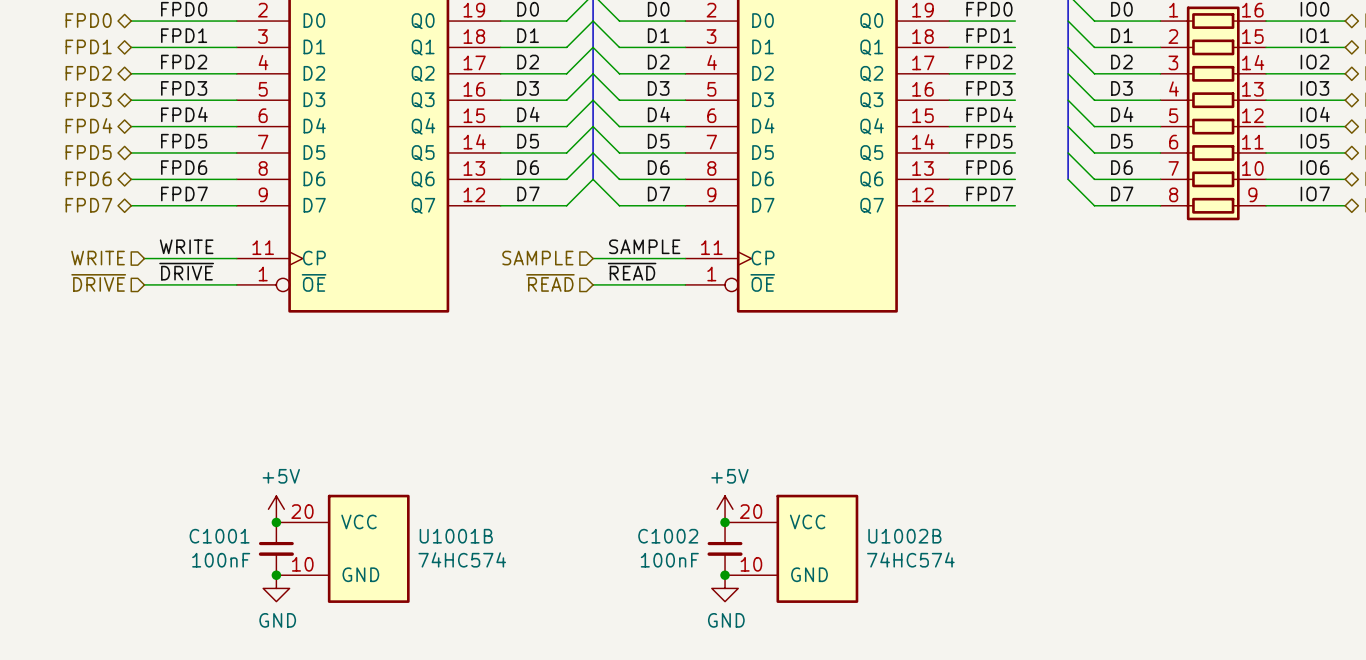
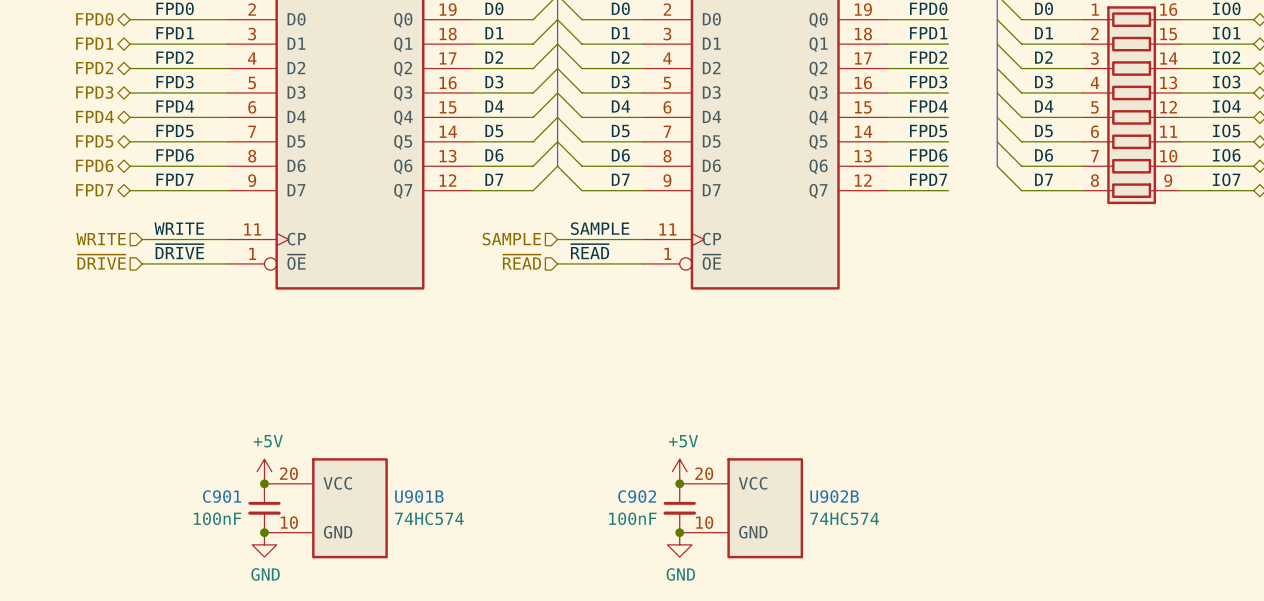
C1001 name: C1001 (219, 536) -> C901 (222, 496)
U1001B name: U1001B (456, 536) -> U901B (419, 496)
C1002 name: C1002 (668, 536) -> C902 (637, 496)
U1002B name: U1002B (904, 536) -> U902B (834, 496)

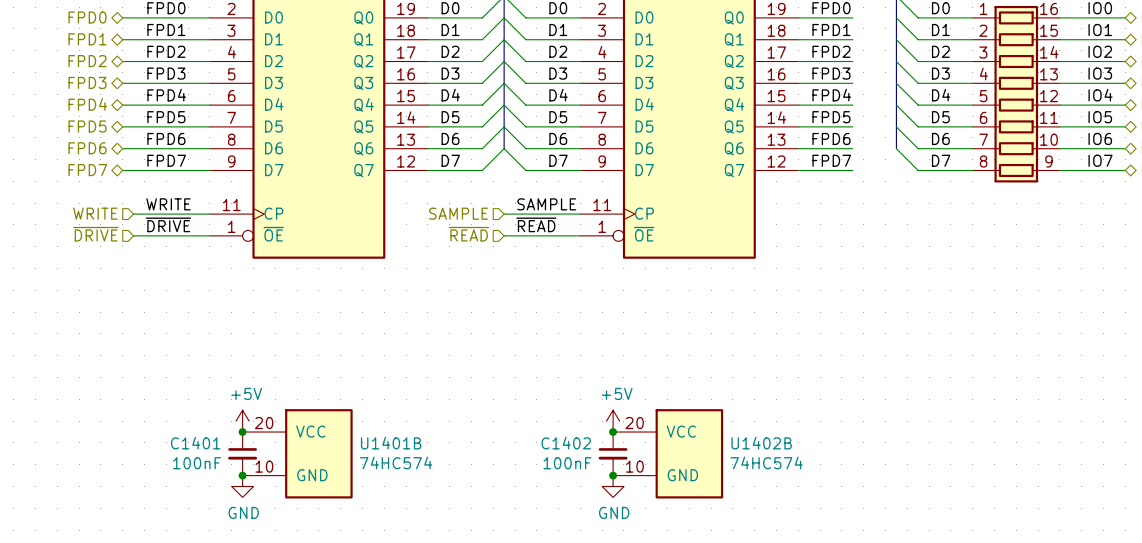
C901 name: C901 (222, 496) -> C1401 (195, 443)
U901B name: U901B (419, 496) -> U1401B (391, 443)
C902 name: C902 (637, 496) -> C1402 (566, 443)
U902B name: U902B (834, 496) -> U1402B (761, 443)

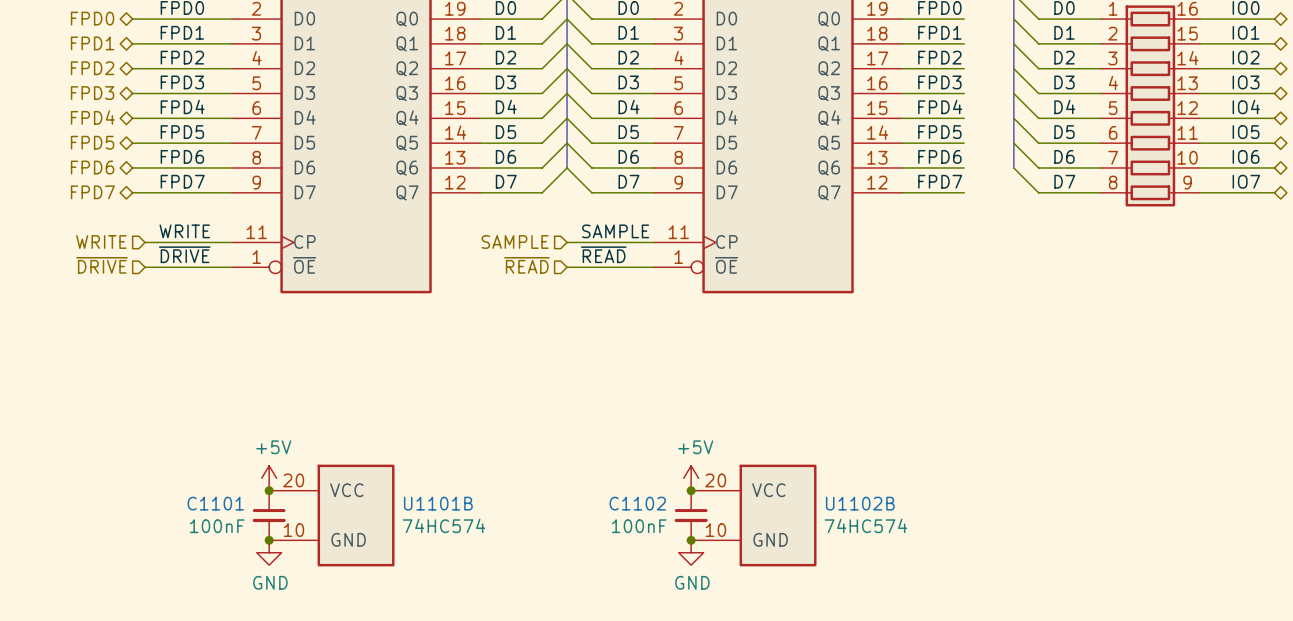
C1401 name: C1401 (195, 443) -> C1101 (215, 503)
U1401B name: U1401B (391, 443) -> U1101B (438, 503)
C1402 name: C1402 (566, 443) -> C1102 (637, 503)
U1402B name: U1402B (761, 443) -> U1102B (860, 503)

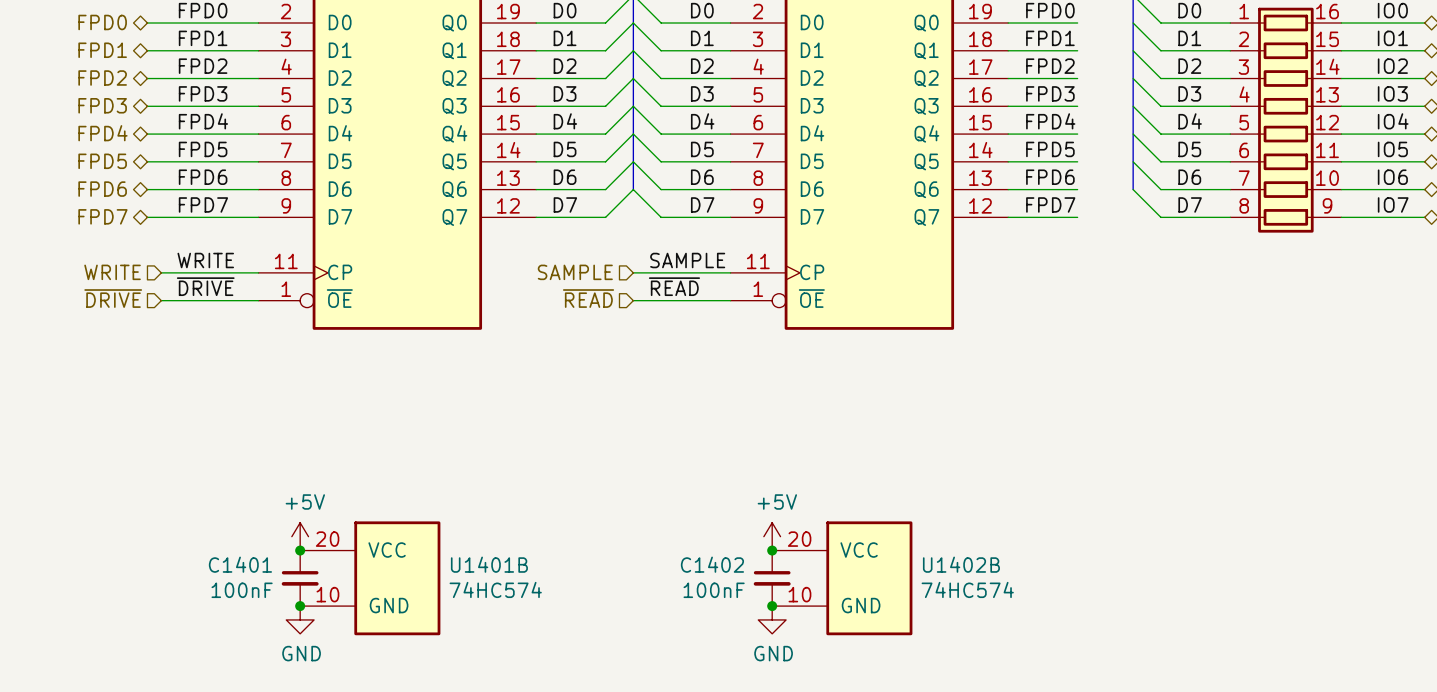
C1101 name: C1101 (215, 503) -> C1401 (240, 564)
U1101B name: U1101B (438, 503) -> U1401B (489, 564)
C1102 name: C1102 (637, 503) -> C1402 (712, 564)
U1102B name: U1102B (860, 503) -> U1402B (961, 564)

